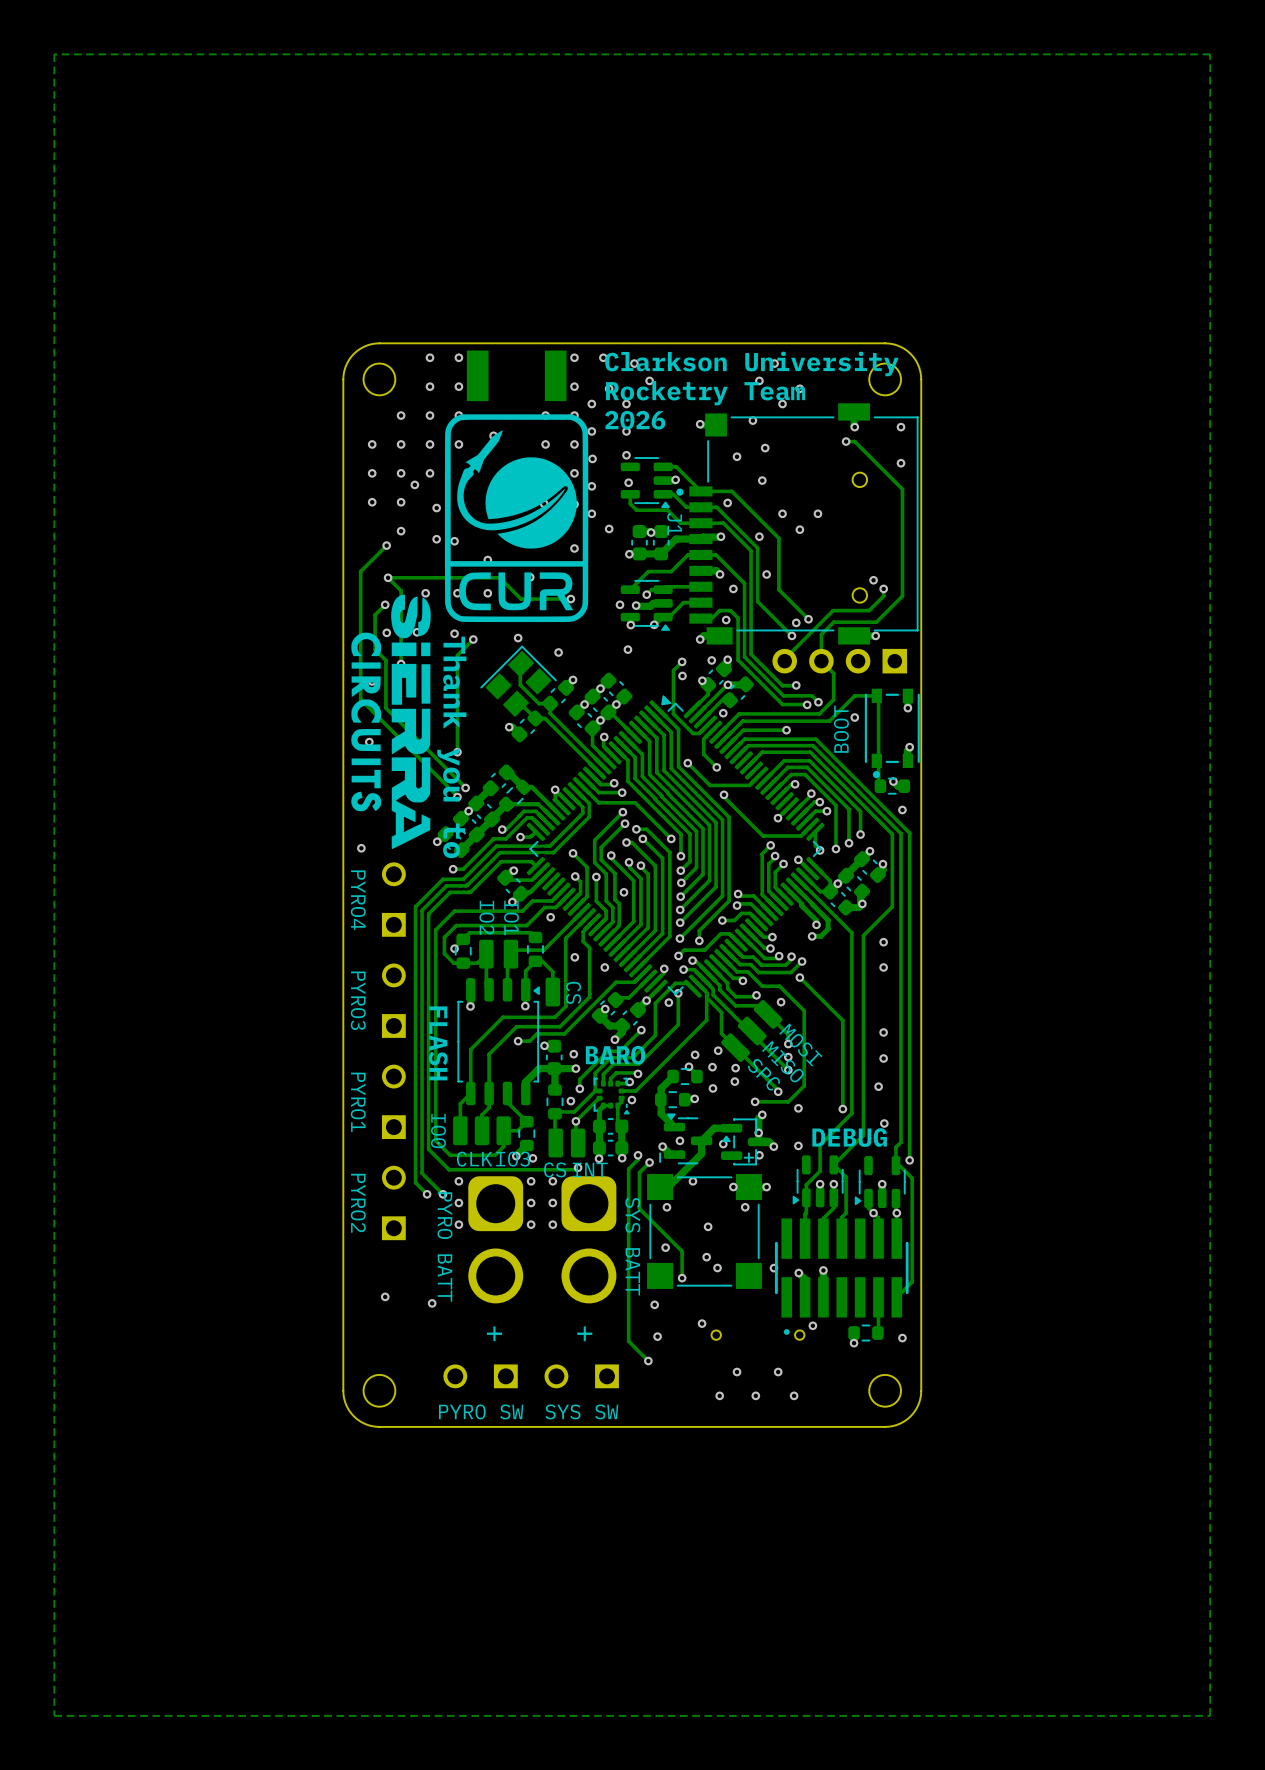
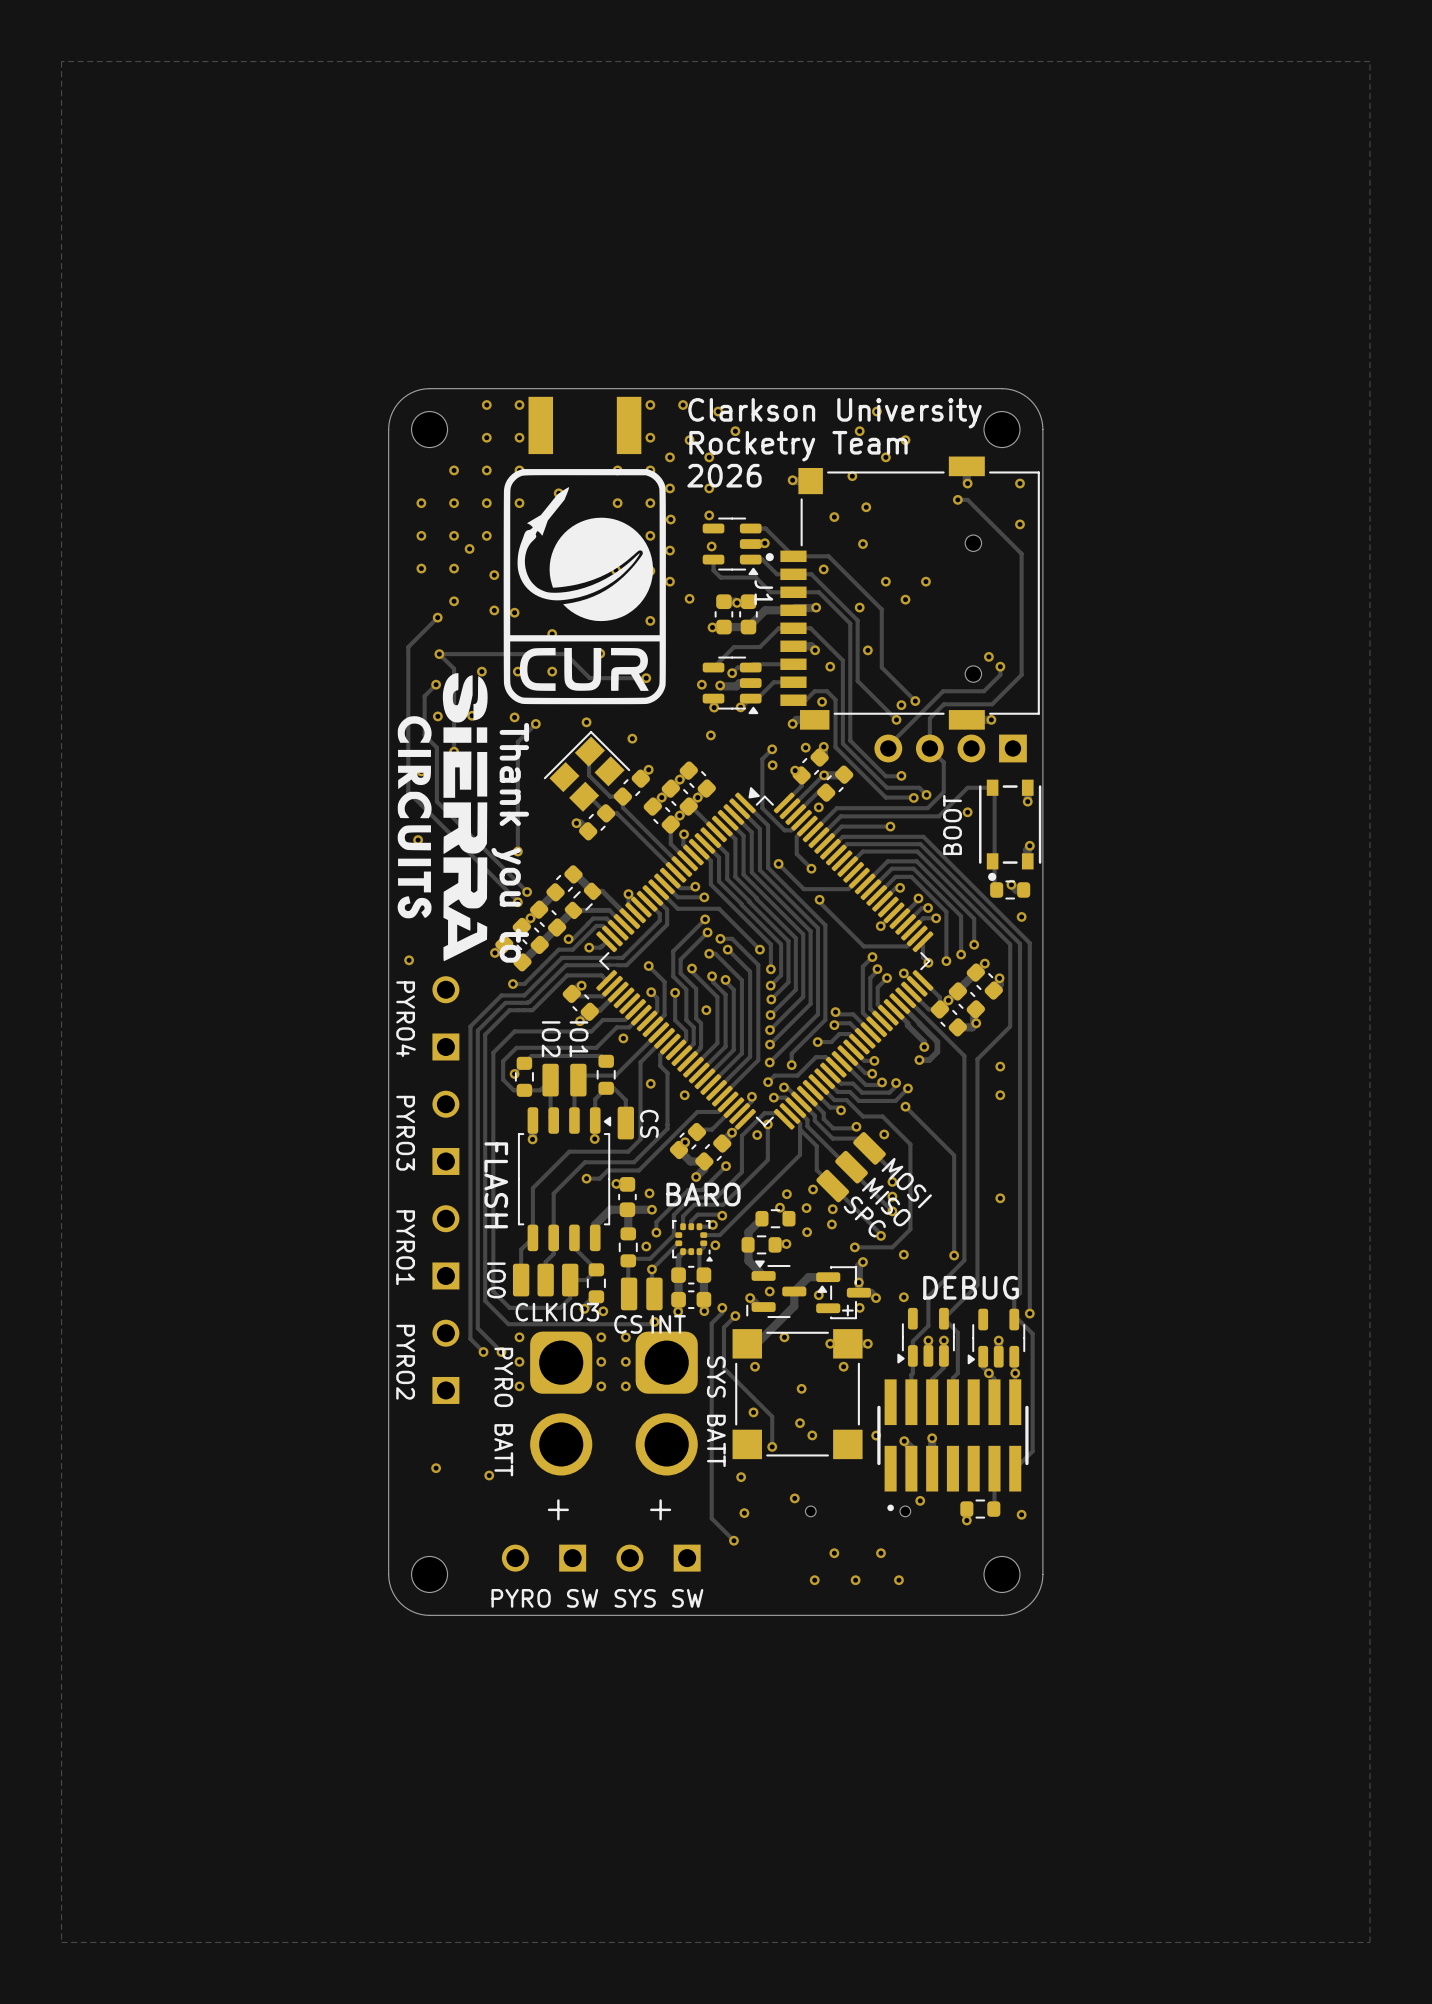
via: (883, 1032) -> none
via: (878, 1086) -> none
via: (884, 1123) -> none

